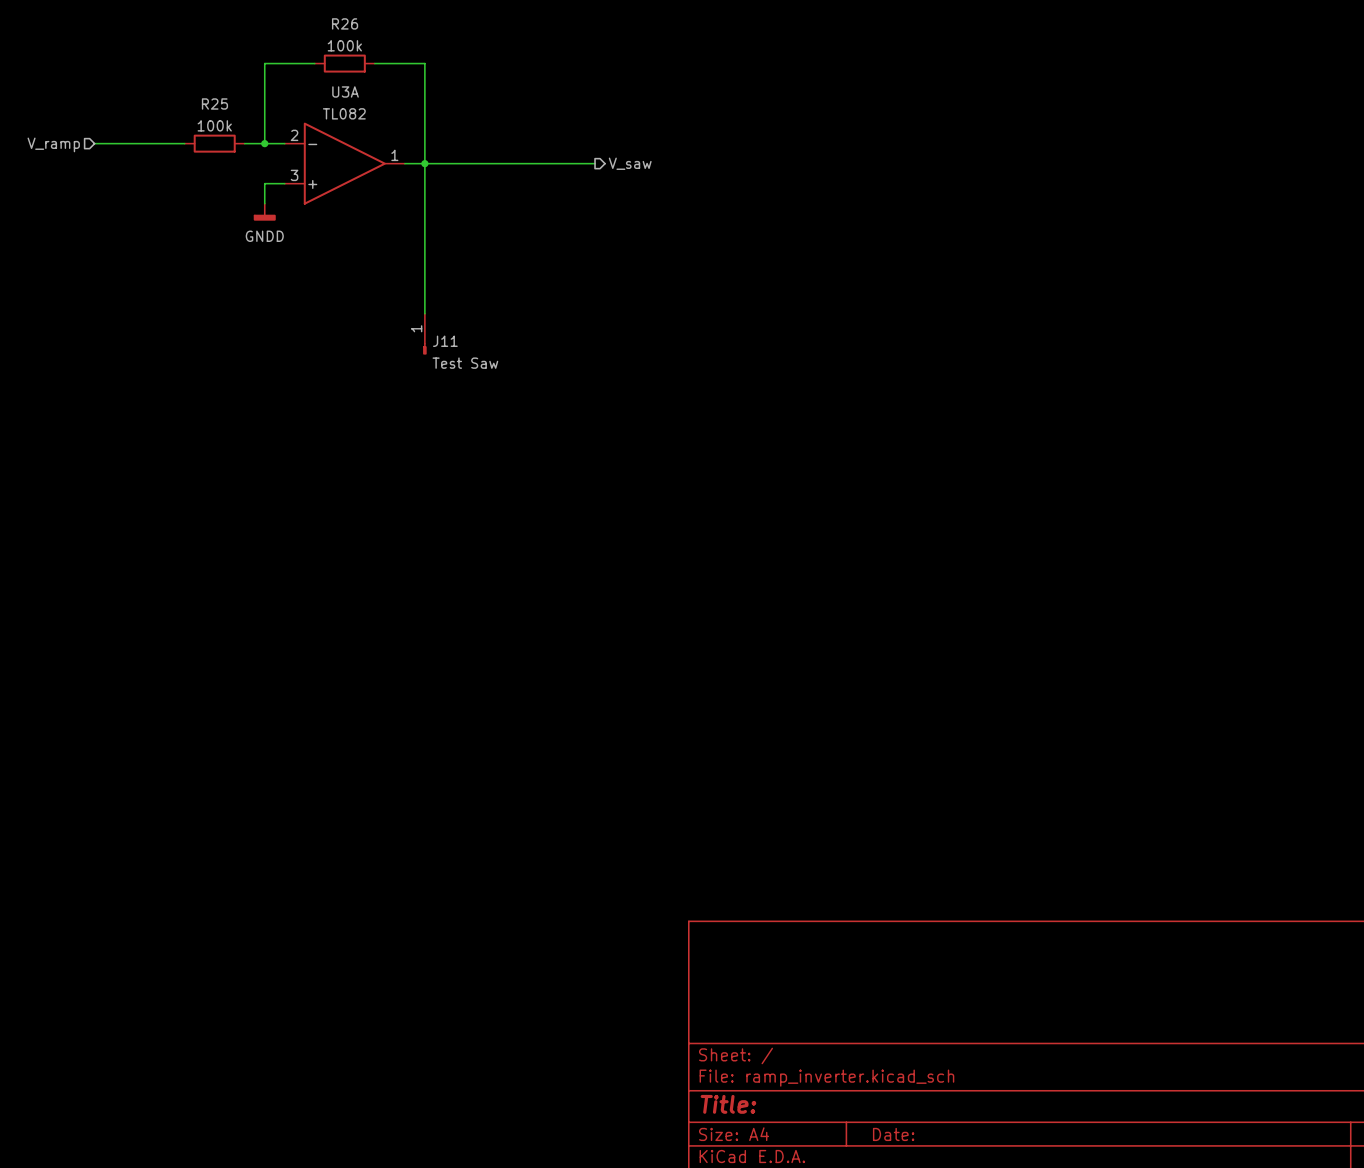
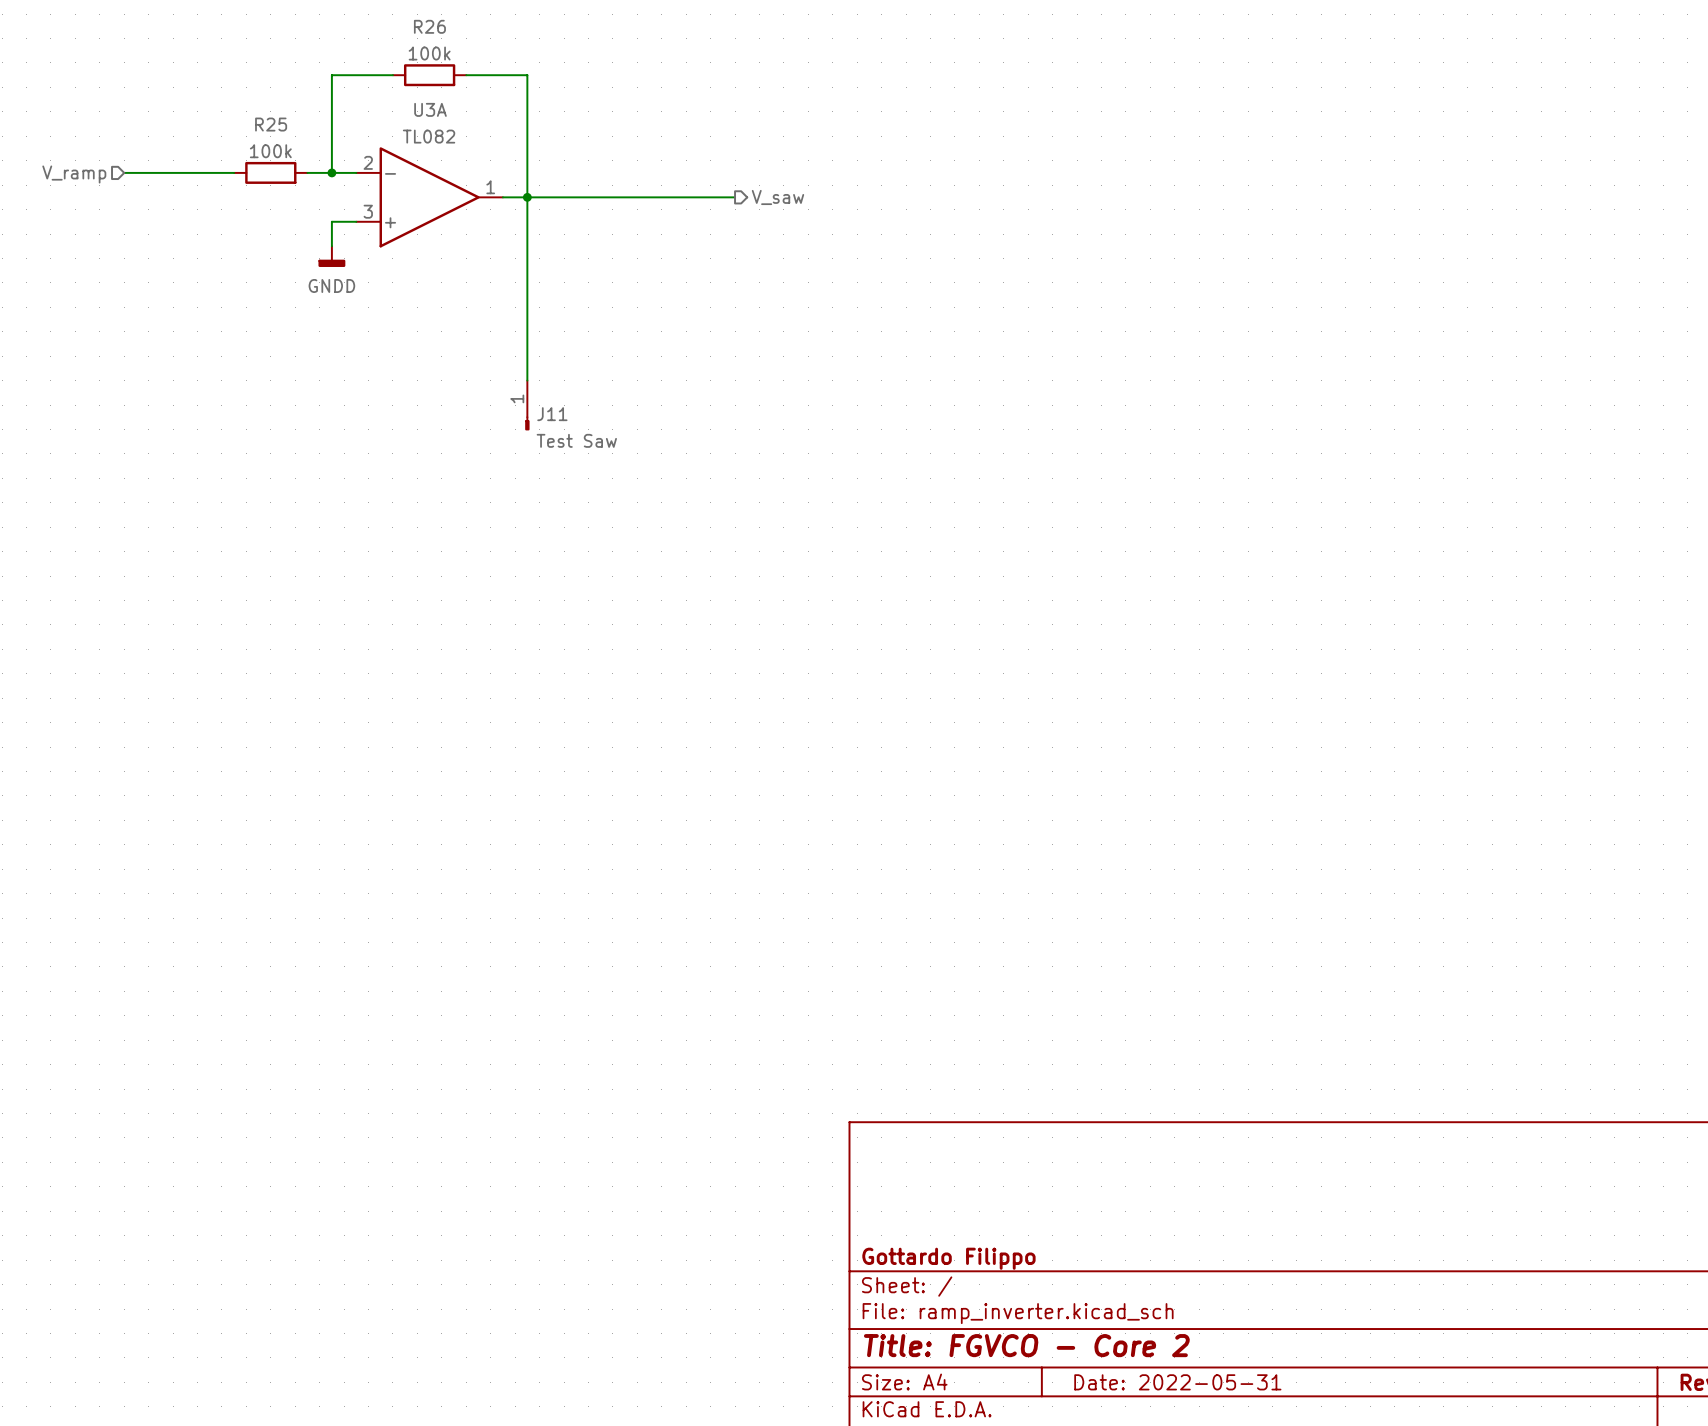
title block: none -> Gottardo Filippo (948, 1258)
title block: Title: (728, 1104) -> Title: FGVCO - Core 2 (1026, 1345)
title block: Date: (893, 1134) -> Date: 2022-05-31 (1177, 1382)

